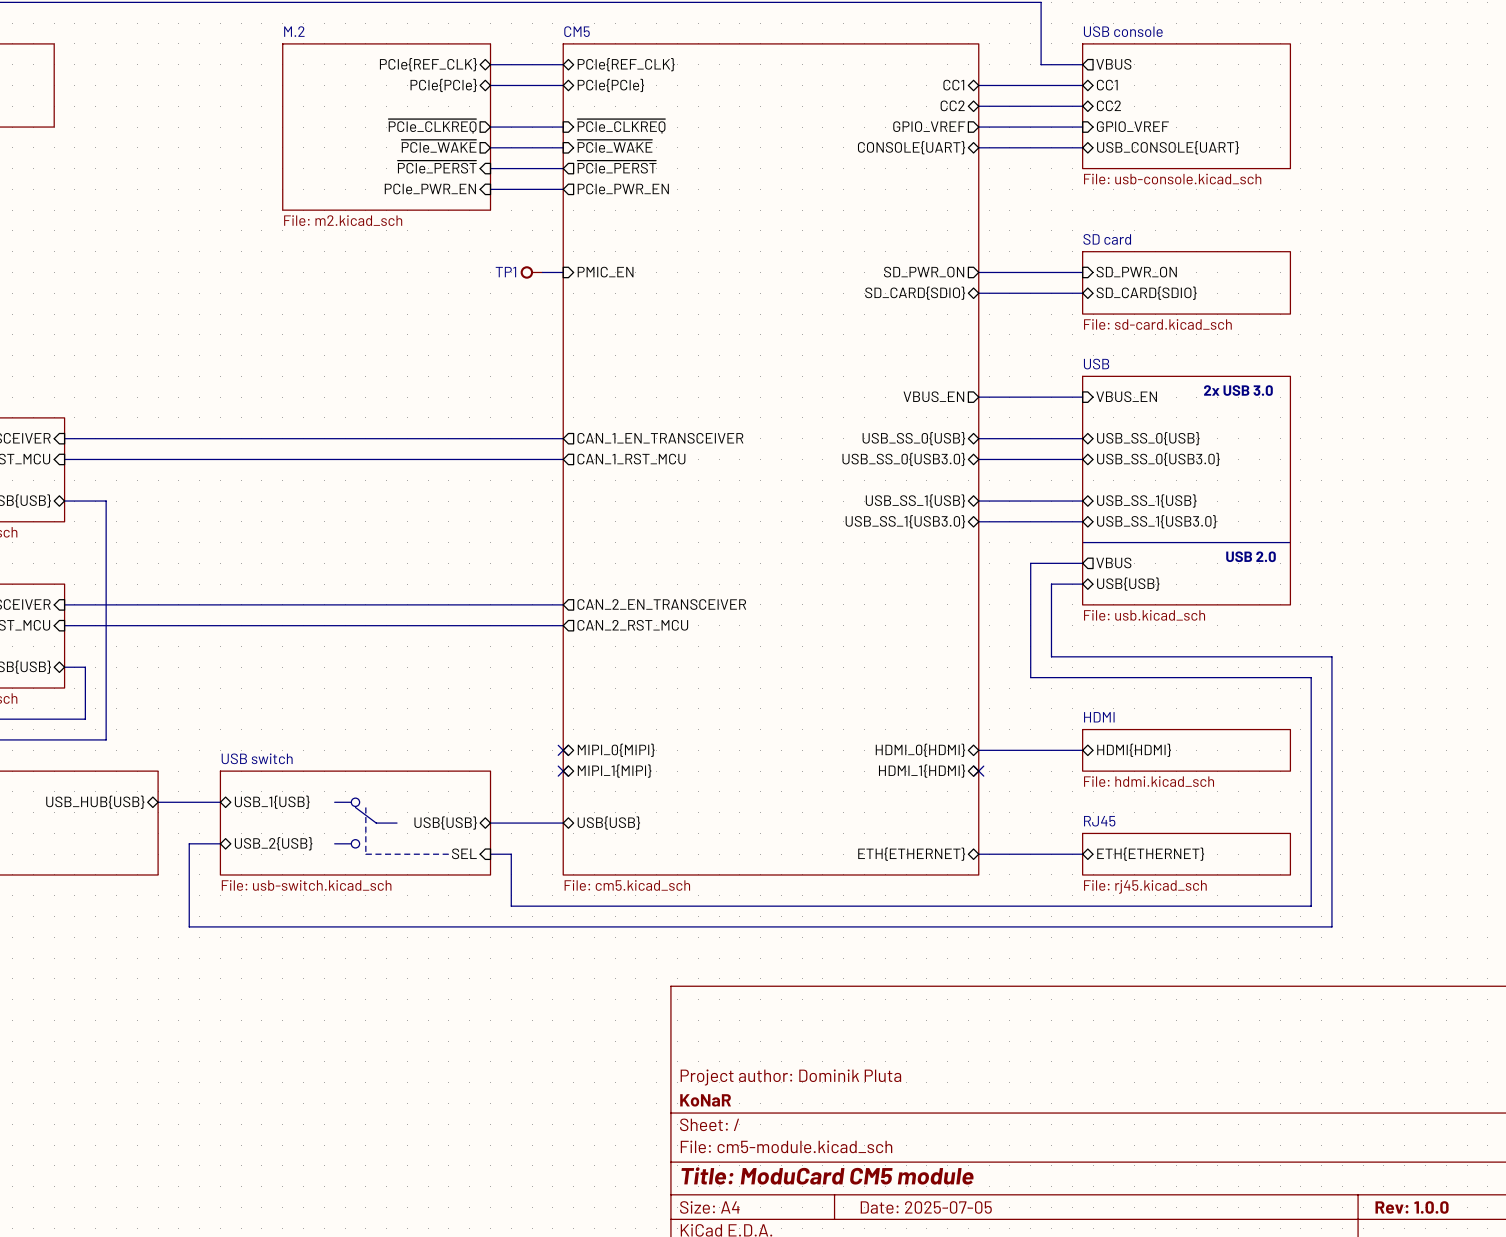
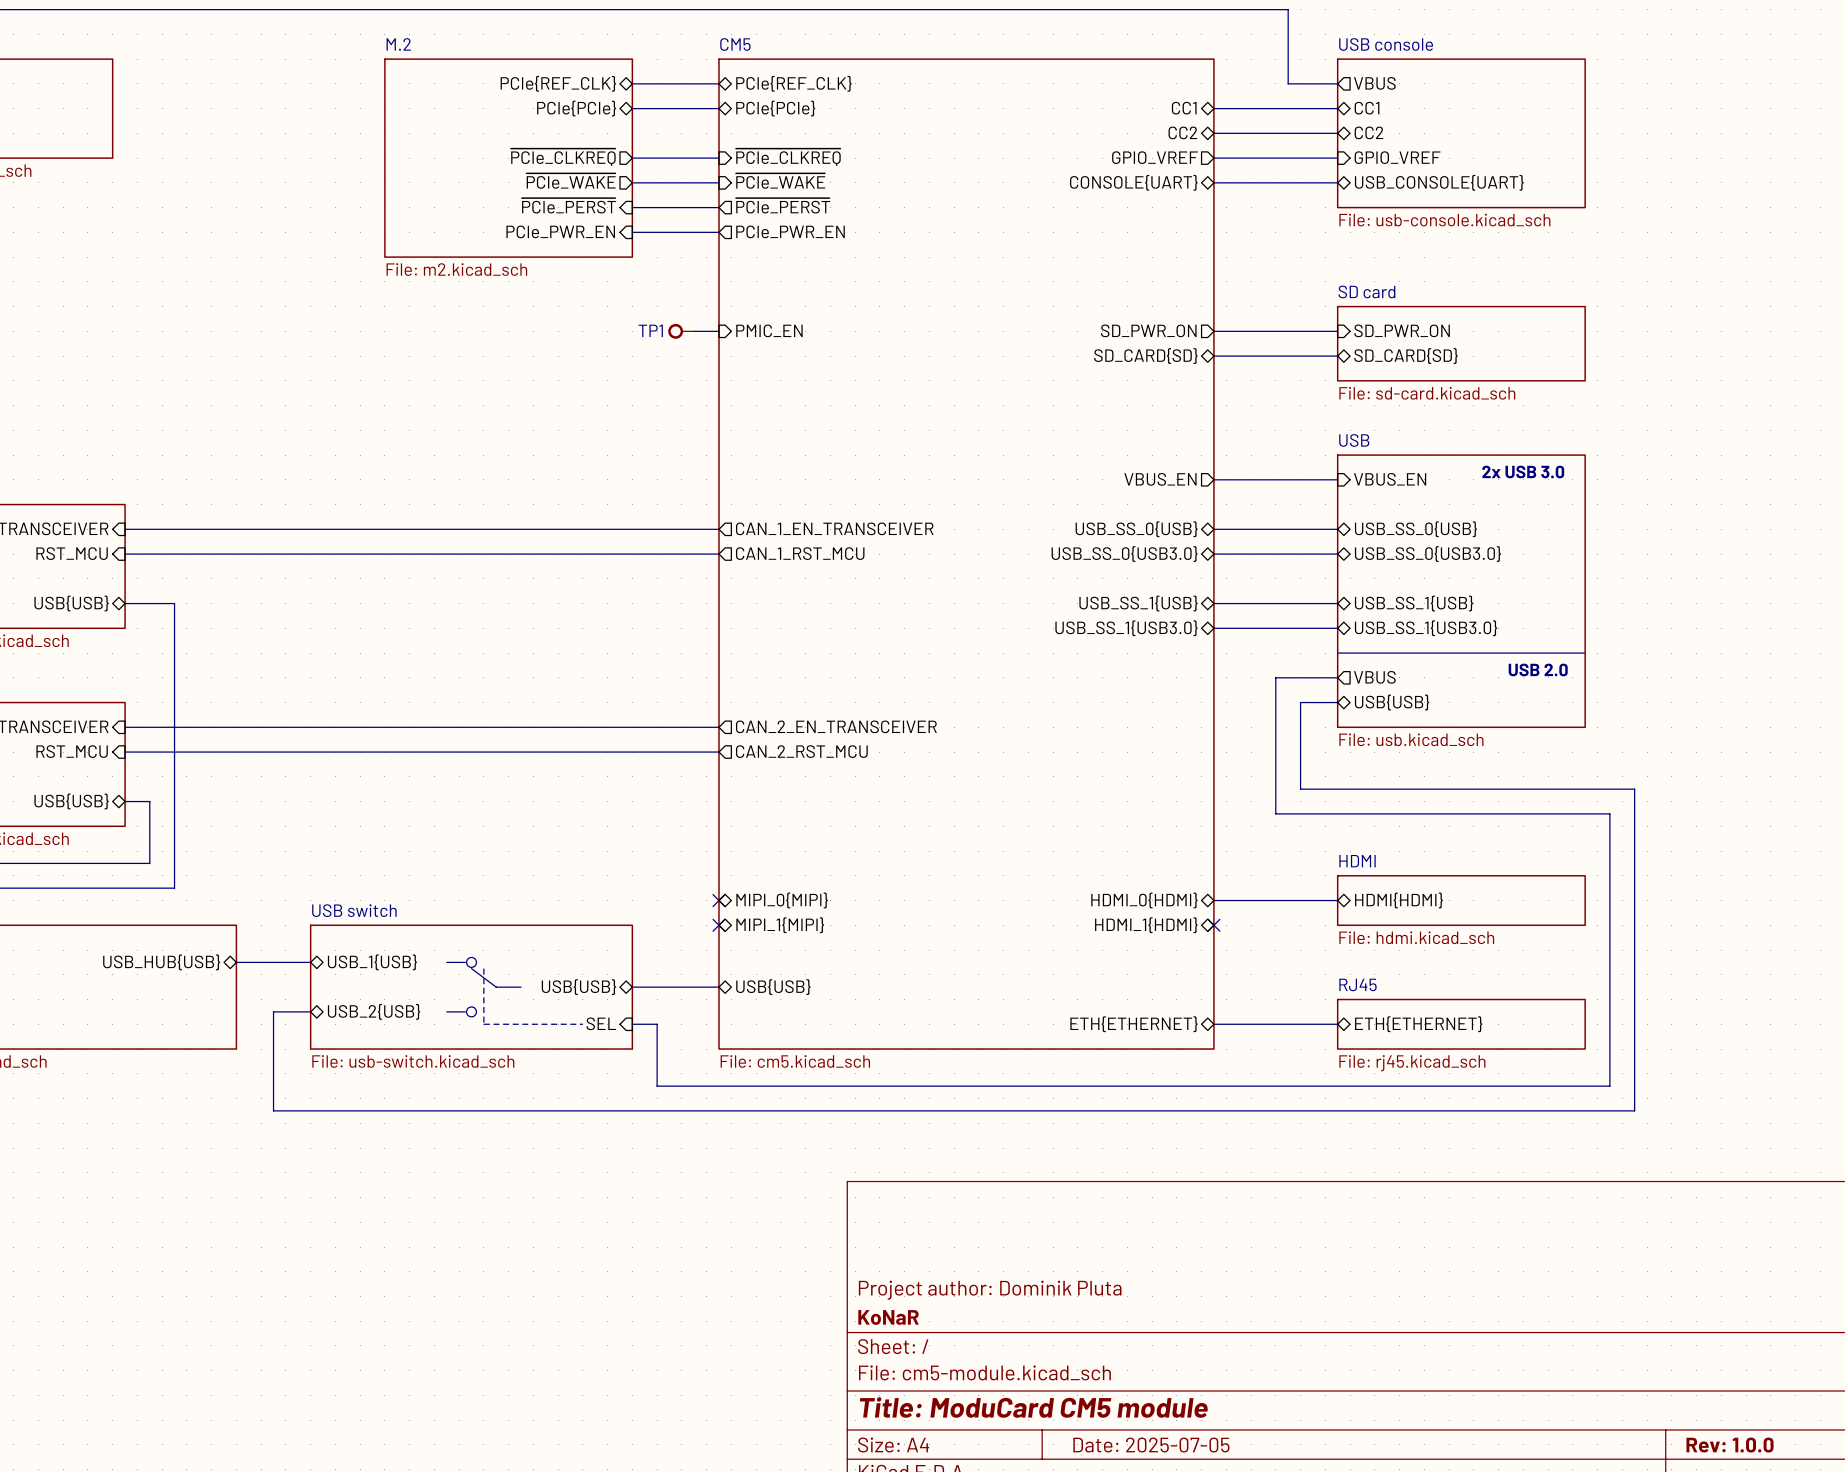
sheet pin: SD_CARD{SDIO} (915, 293) -> SD_CARD{SD} (1145, 356)
sheet pin: SD_CARD{SDIO} (1146, 293) -> SD_CARD{SD} (1406, 356)

